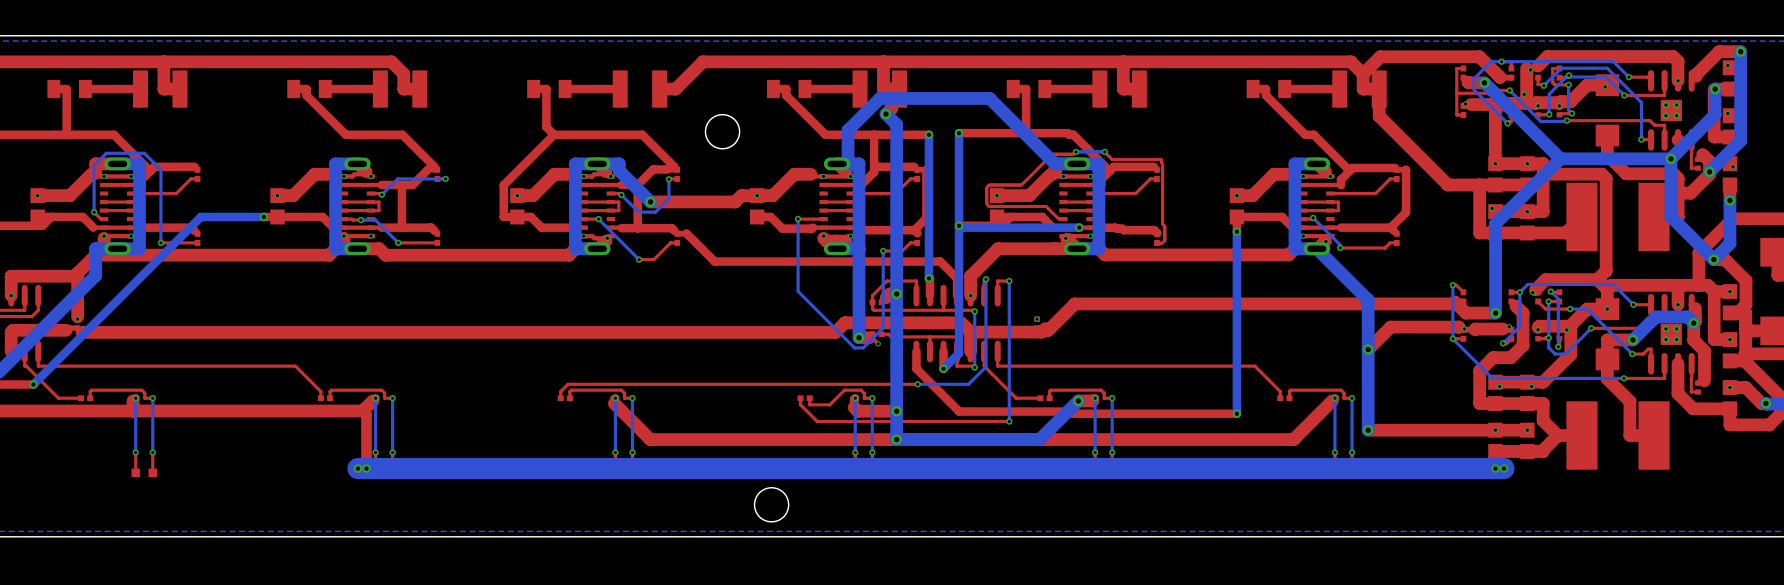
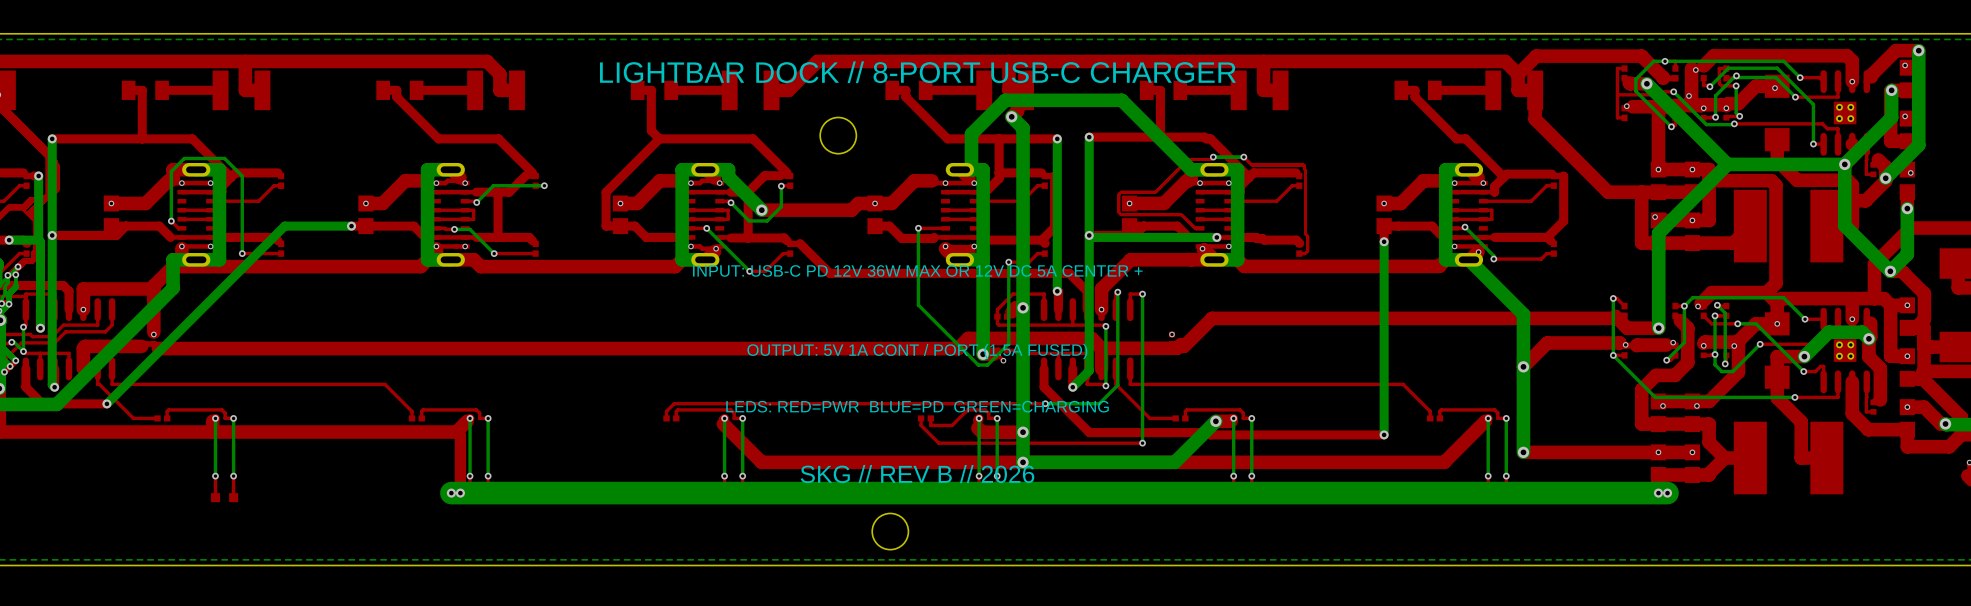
text: none -> LIGHTBAR DOCK // 8-PORT USB-C CHARGER (917, 72)
text: none -> INPUT: USB-C PD 12V 36W MAX OR 12V DC 5A CENTER + (917, 270)
text: none -> OUTPUT: 5V 1A CONT / PORT (1.5A FUSED) (917, 351)
text: none -> LEDS: RED=PWR BLUE=PD GREEN=CHARGING (917, 406)
text: none -> SKG // REV B // 2026 (917, 474)

